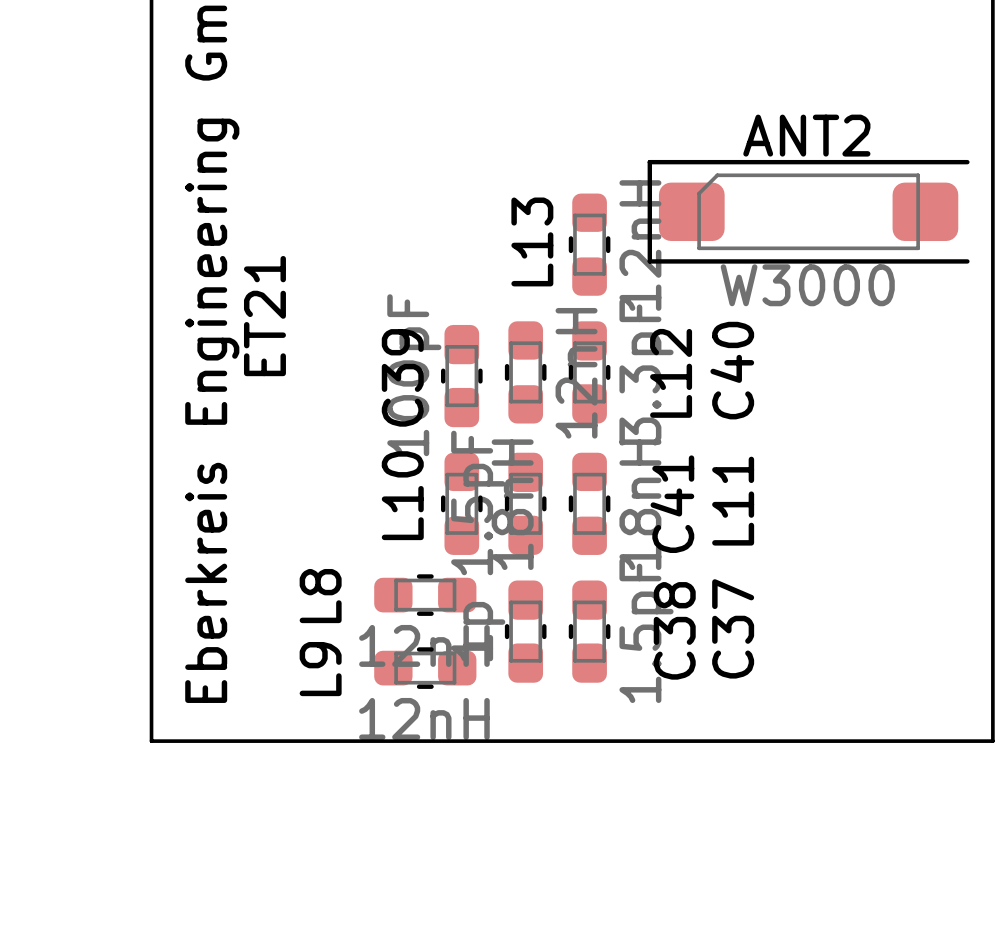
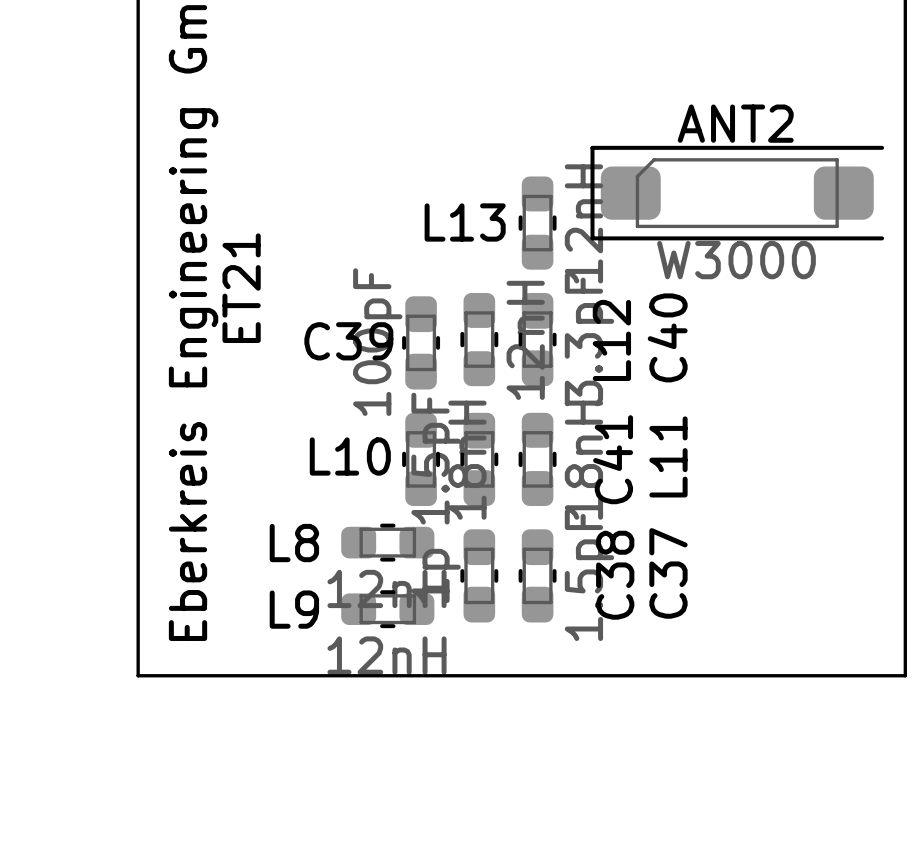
L13 name rotation: 0° (532, 241) -> 90° clockwise (465, 222)
C39 name rotation: 0° (402, 377) -> 90° clockwise (348, 341)
L10 name rotation: 0° (402, 495) -> 90° clockwise (350, 456)
L8 name rotation: 0° (320, 596) -> 90° clockwise (294, 543)
L9 name rotation: 0° (320, 669) -> 90° clockwise (294, 609)

